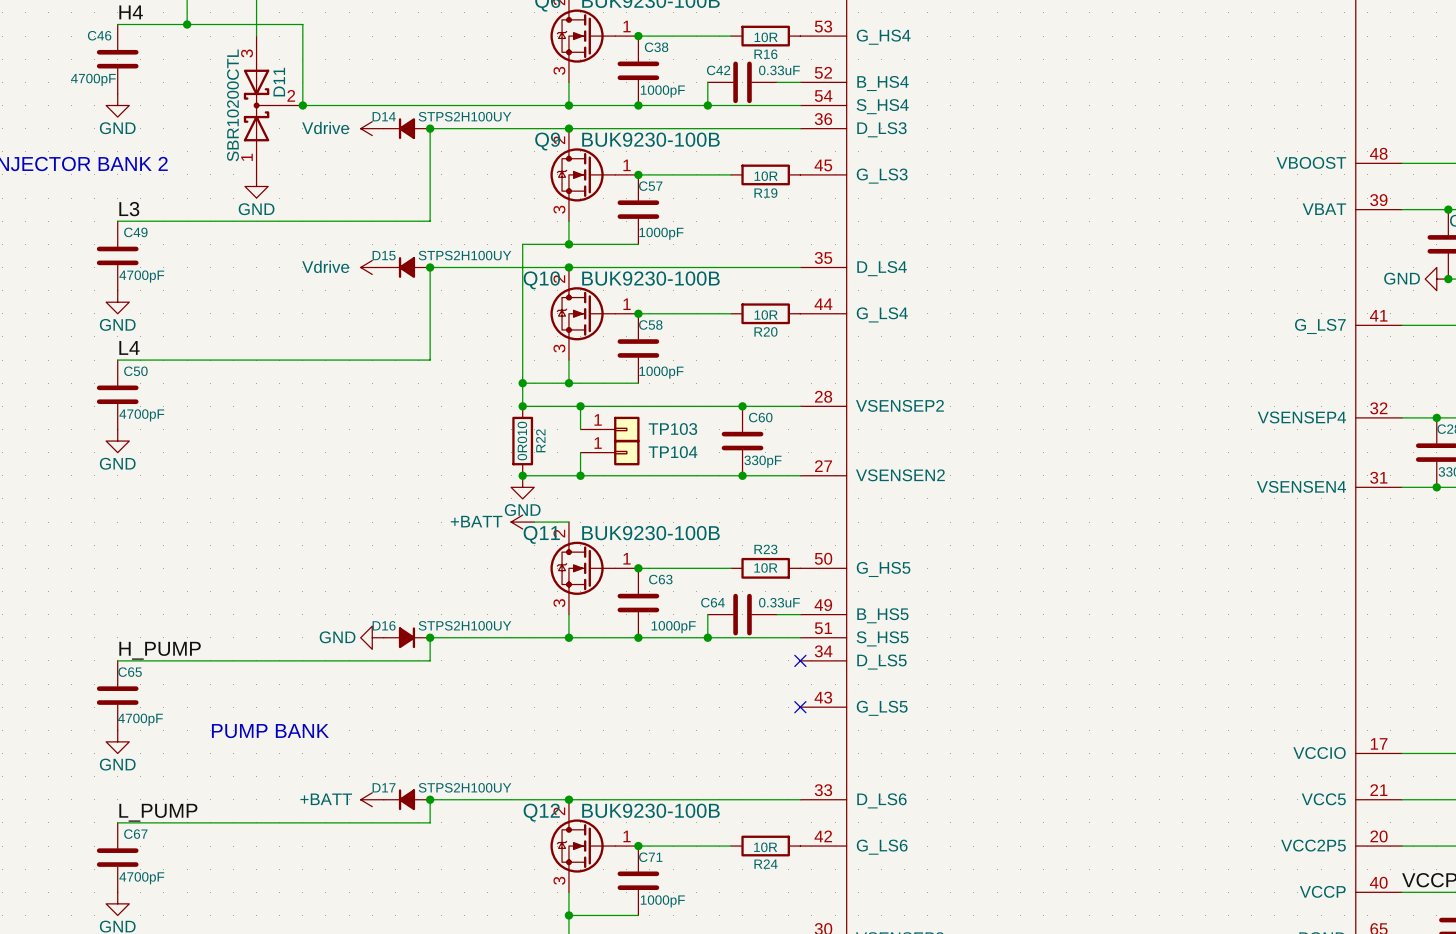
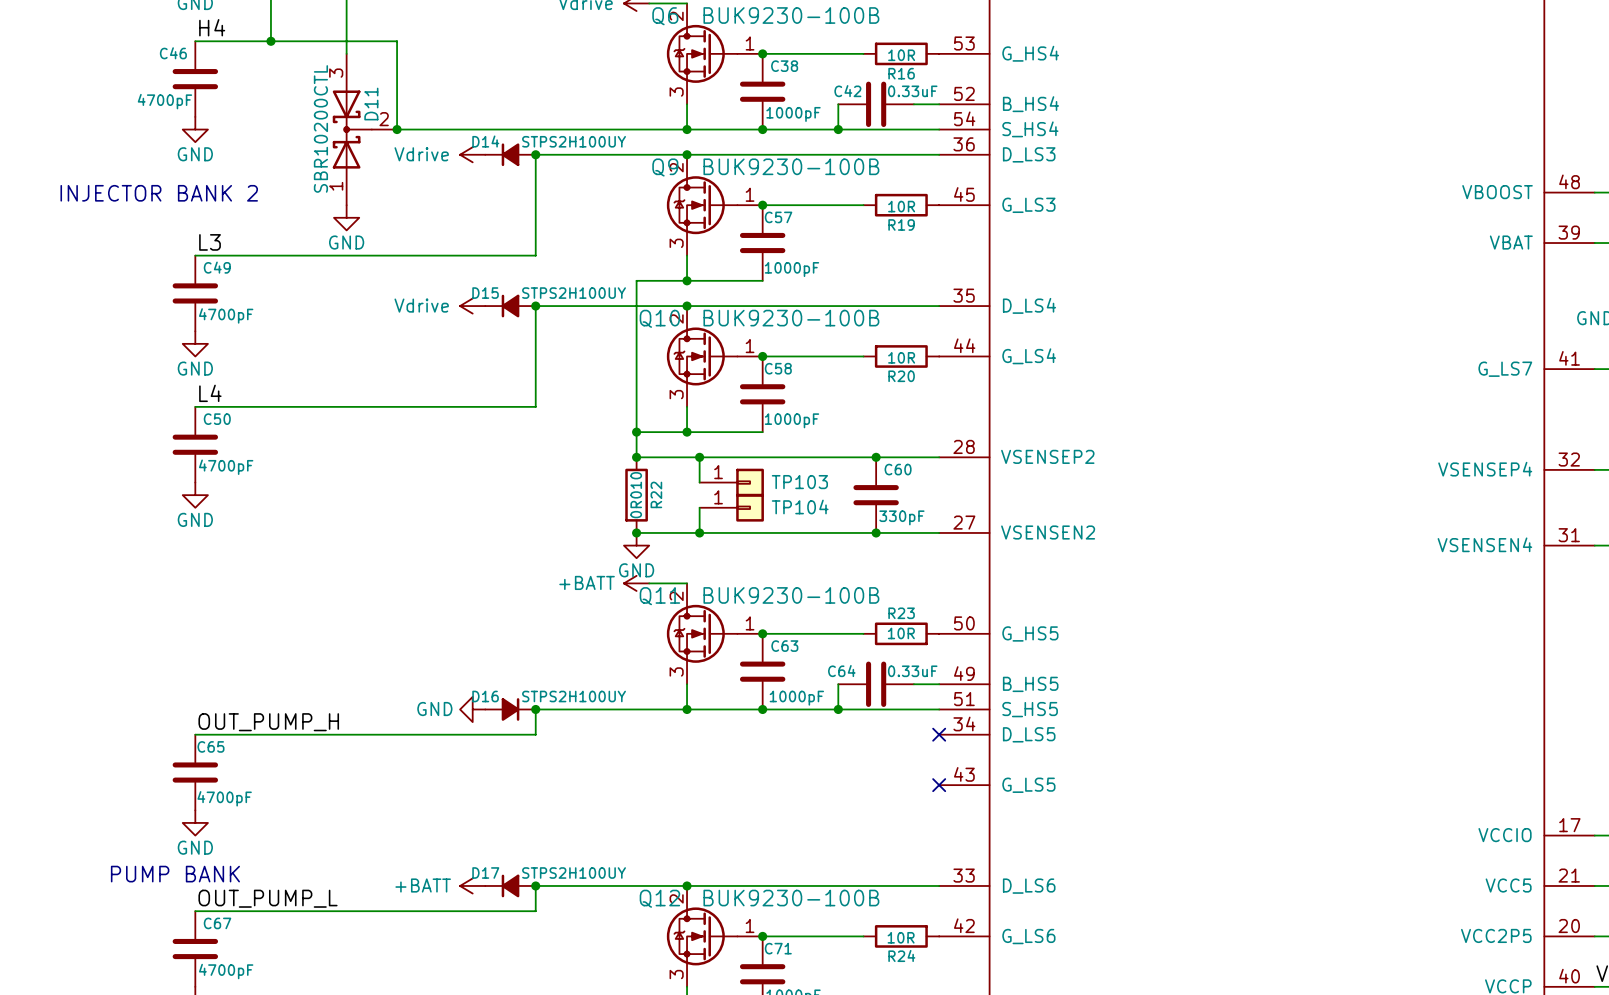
label: H_PUMP (160, 650) -> OUT_PUMP_H (268, 722)
text position: PUMP BANK (270, 731) -> PUMP BANK (175, 874)
label: L_PUMP (158, 812) -> OUT_PUMP_L (268, 898)

